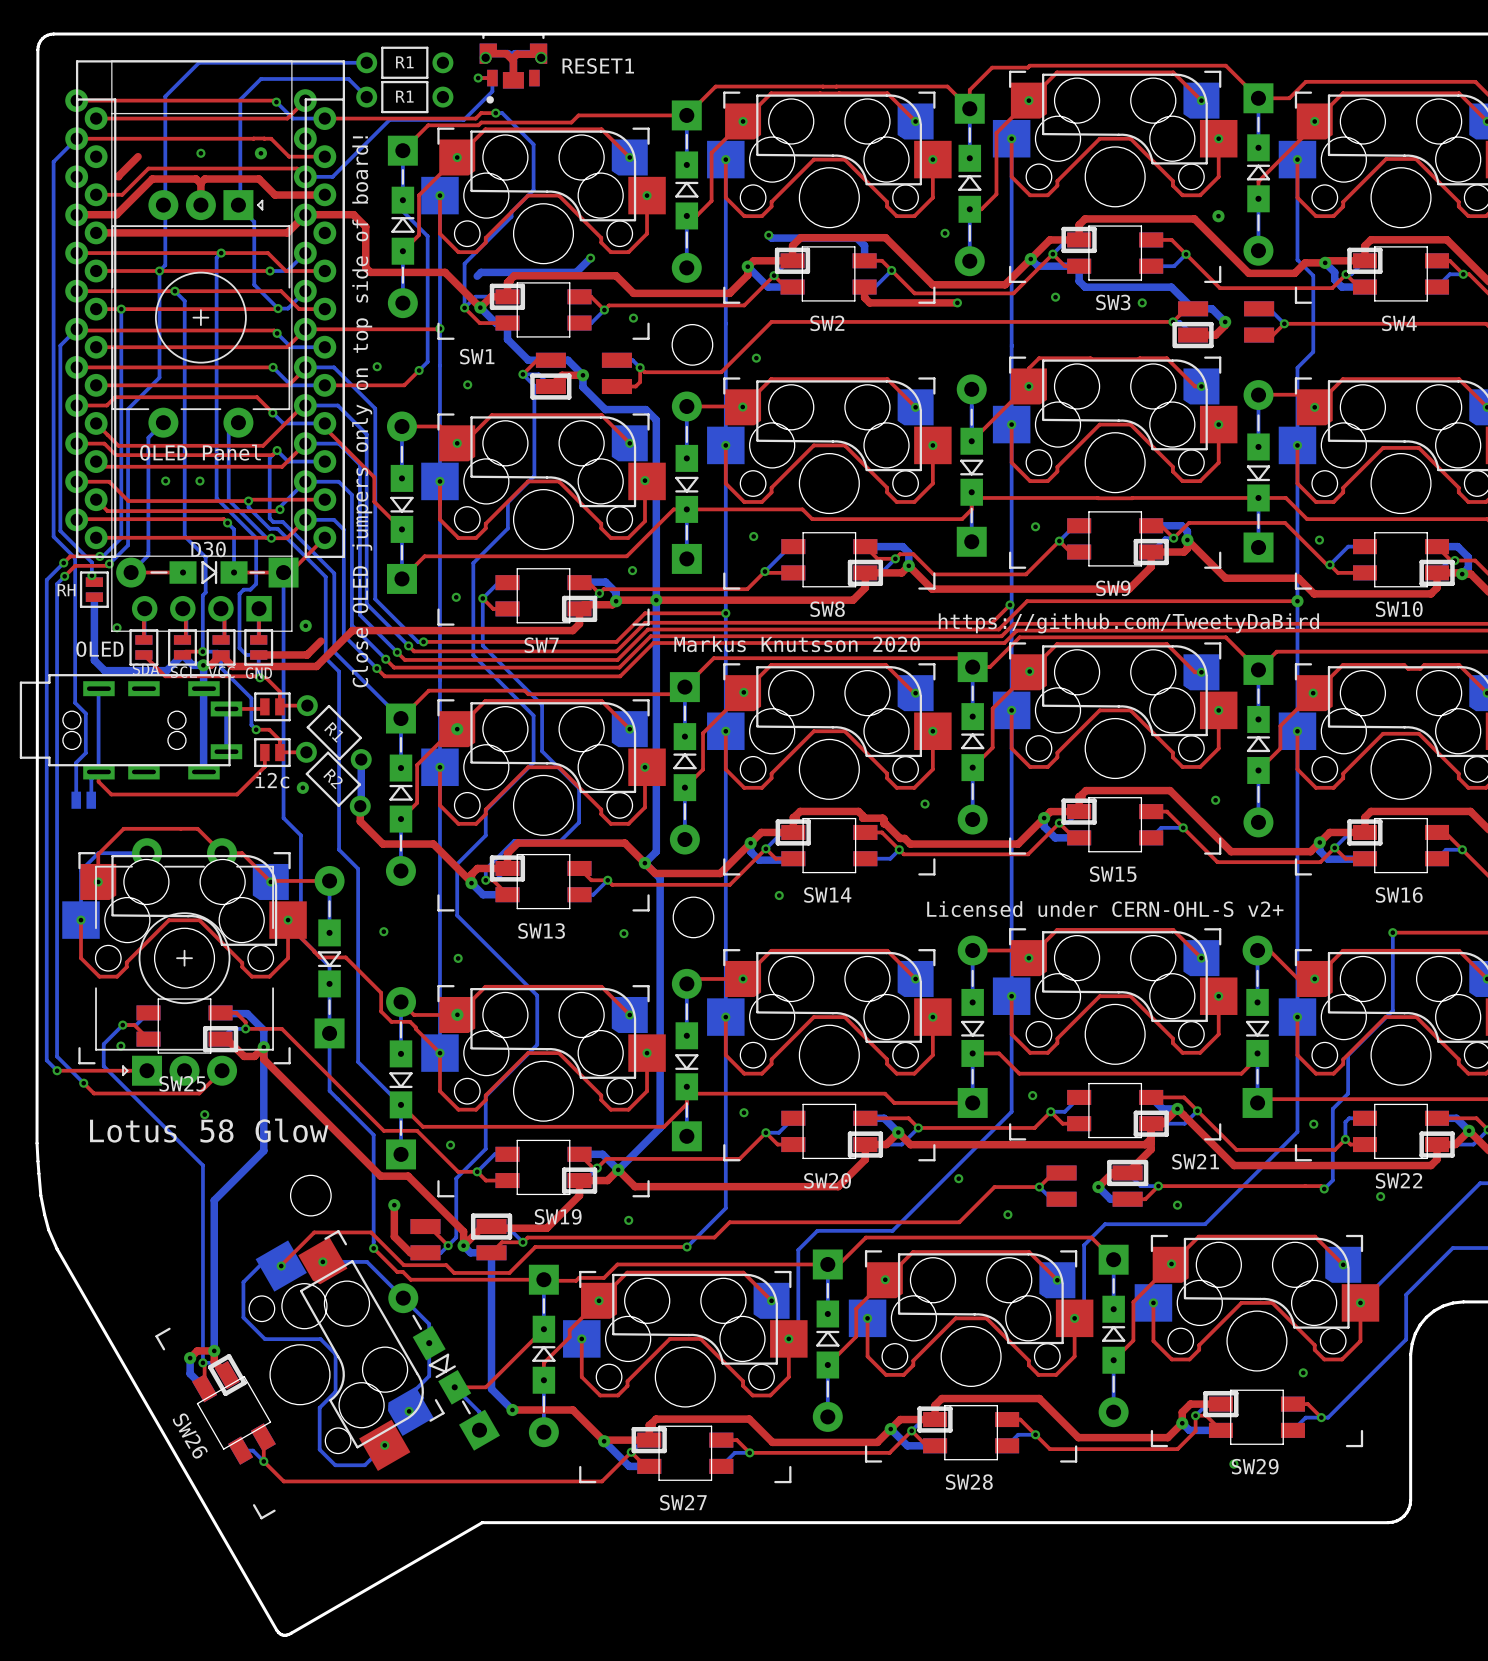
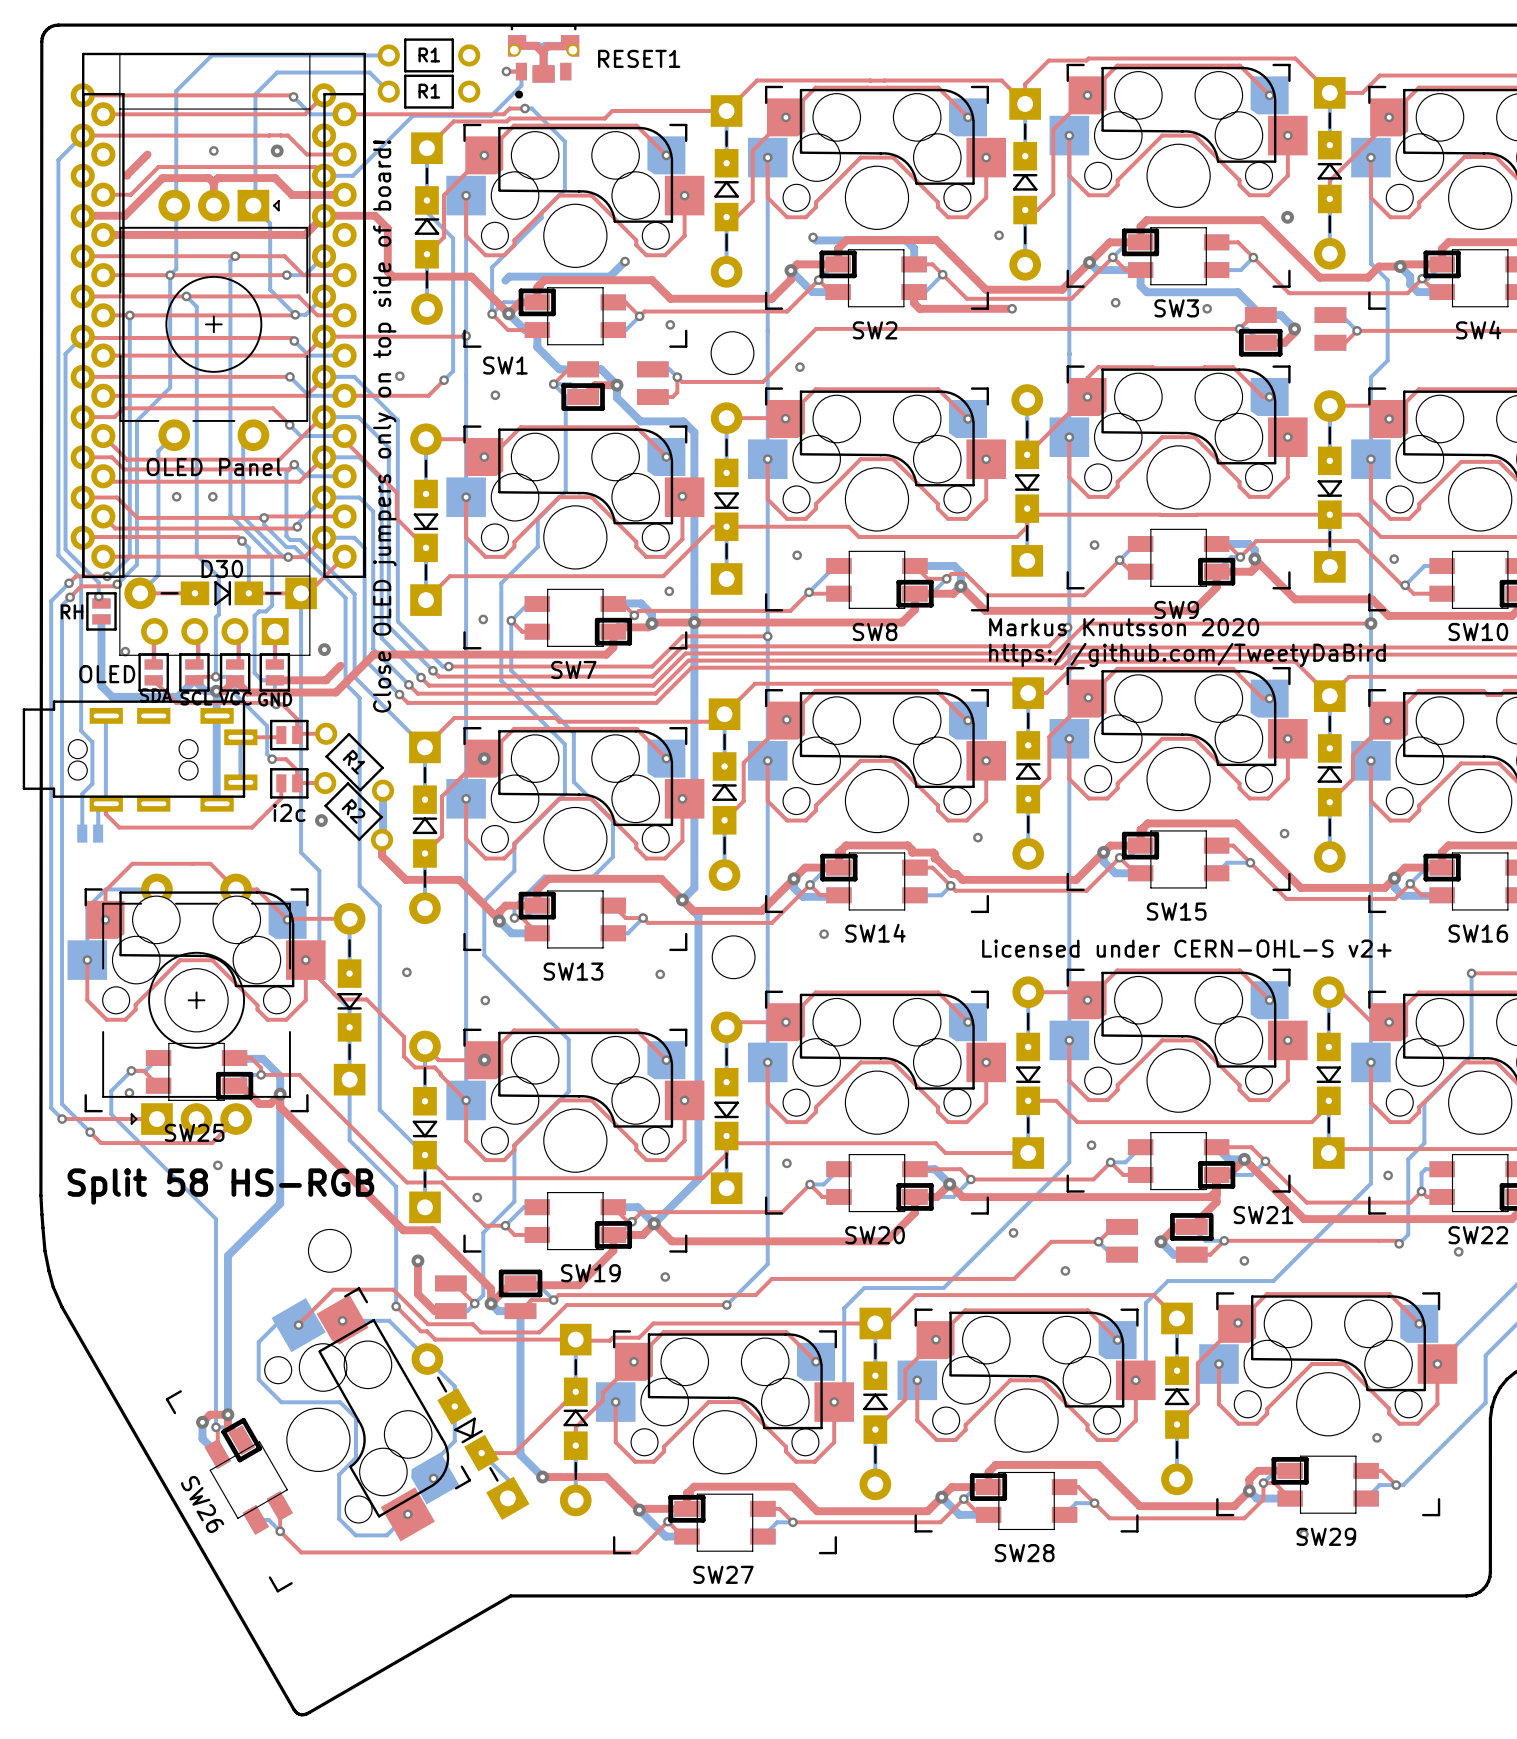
text position: https://github.com/TweetyDaBird (1128, 623) -> https://github.com/TweetyDaBird (1187, 654)
text position: Markus Knutsson 2020 (797, 644) -> Markus Knutsson 2020 (1124, 627)
text: Lotus 58 Glow (209, 1130) -> Split 58 HS-RGB (220, 1186)

